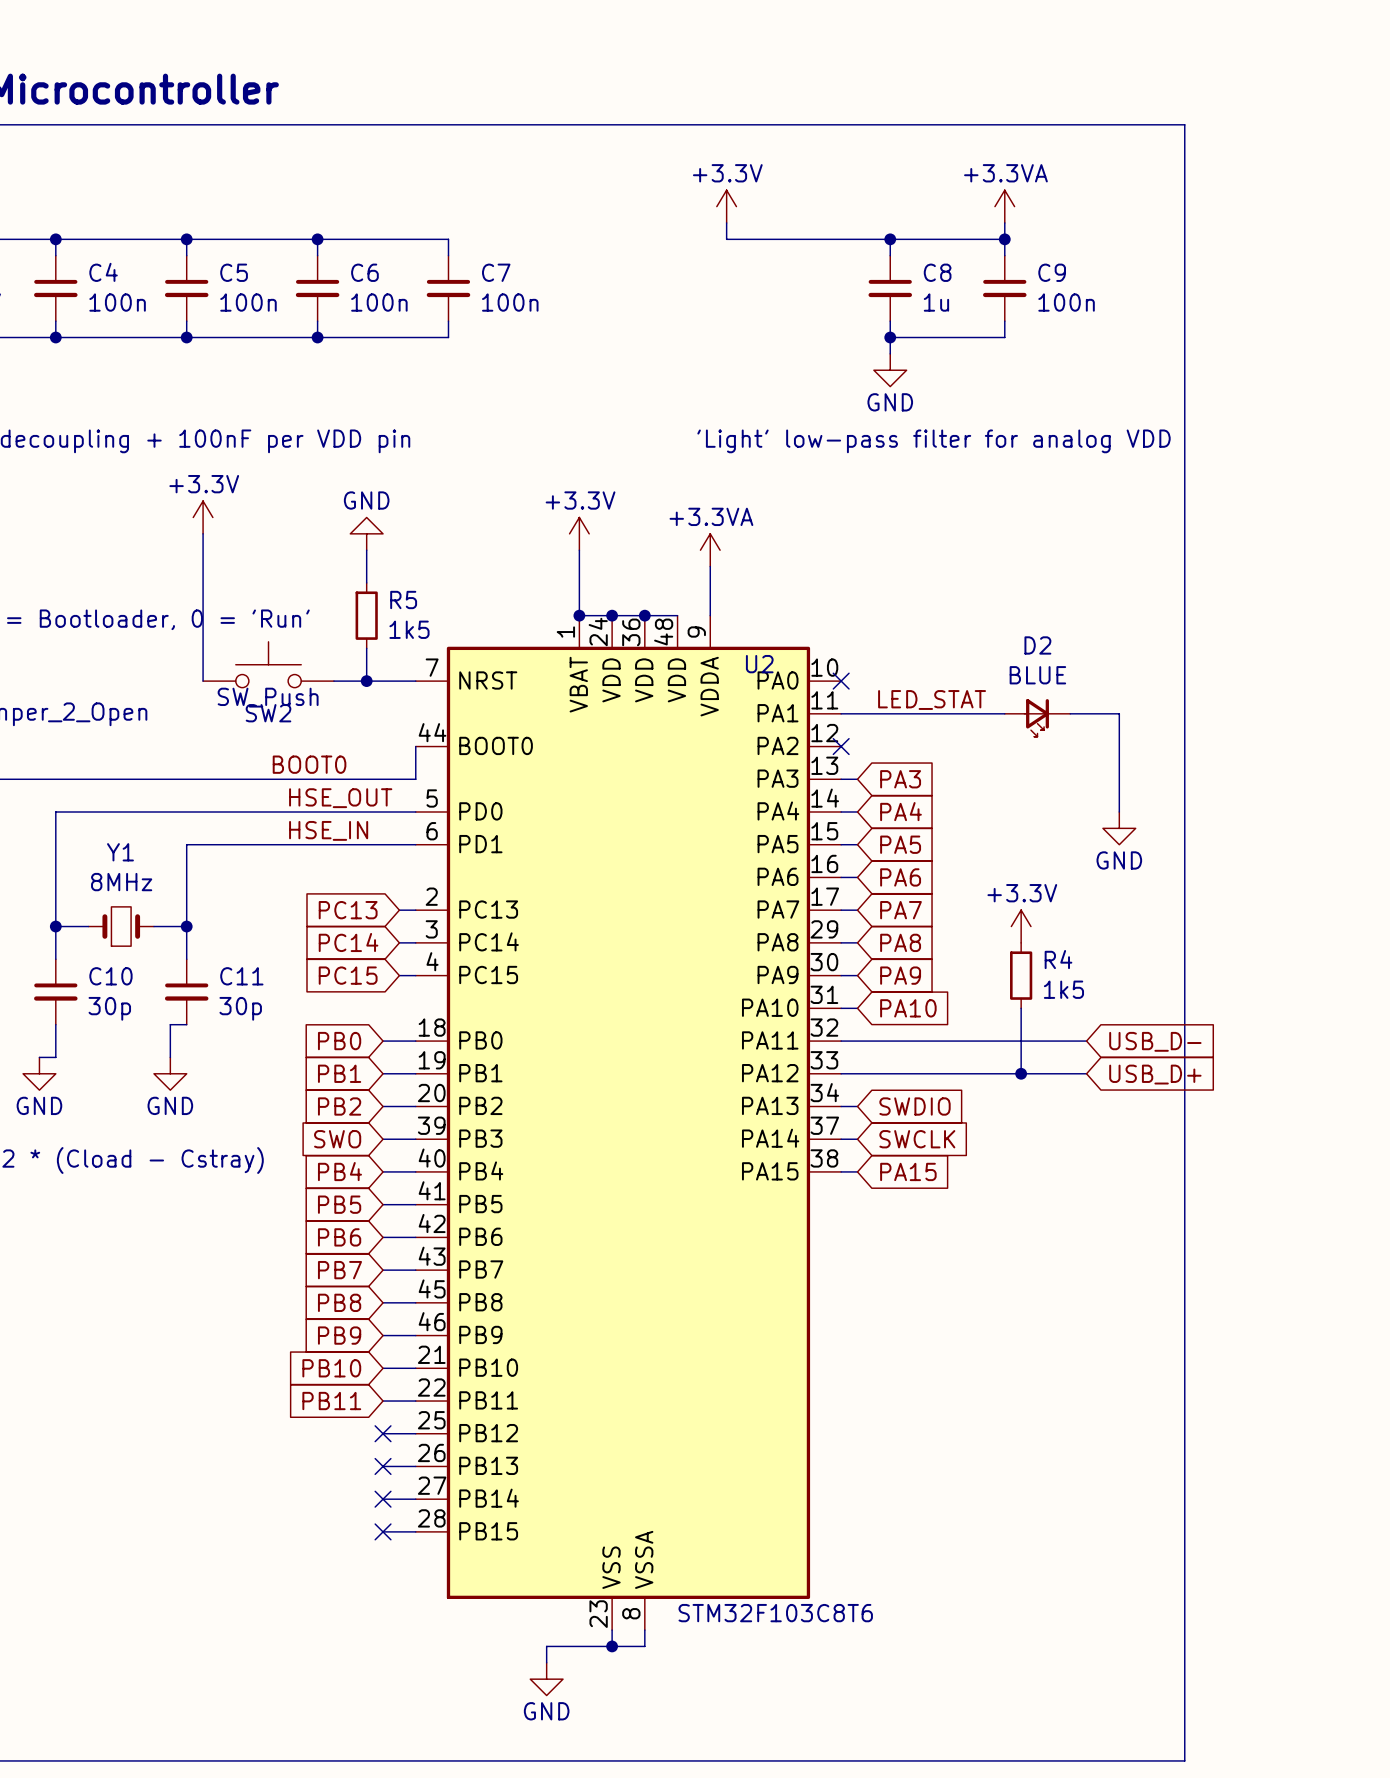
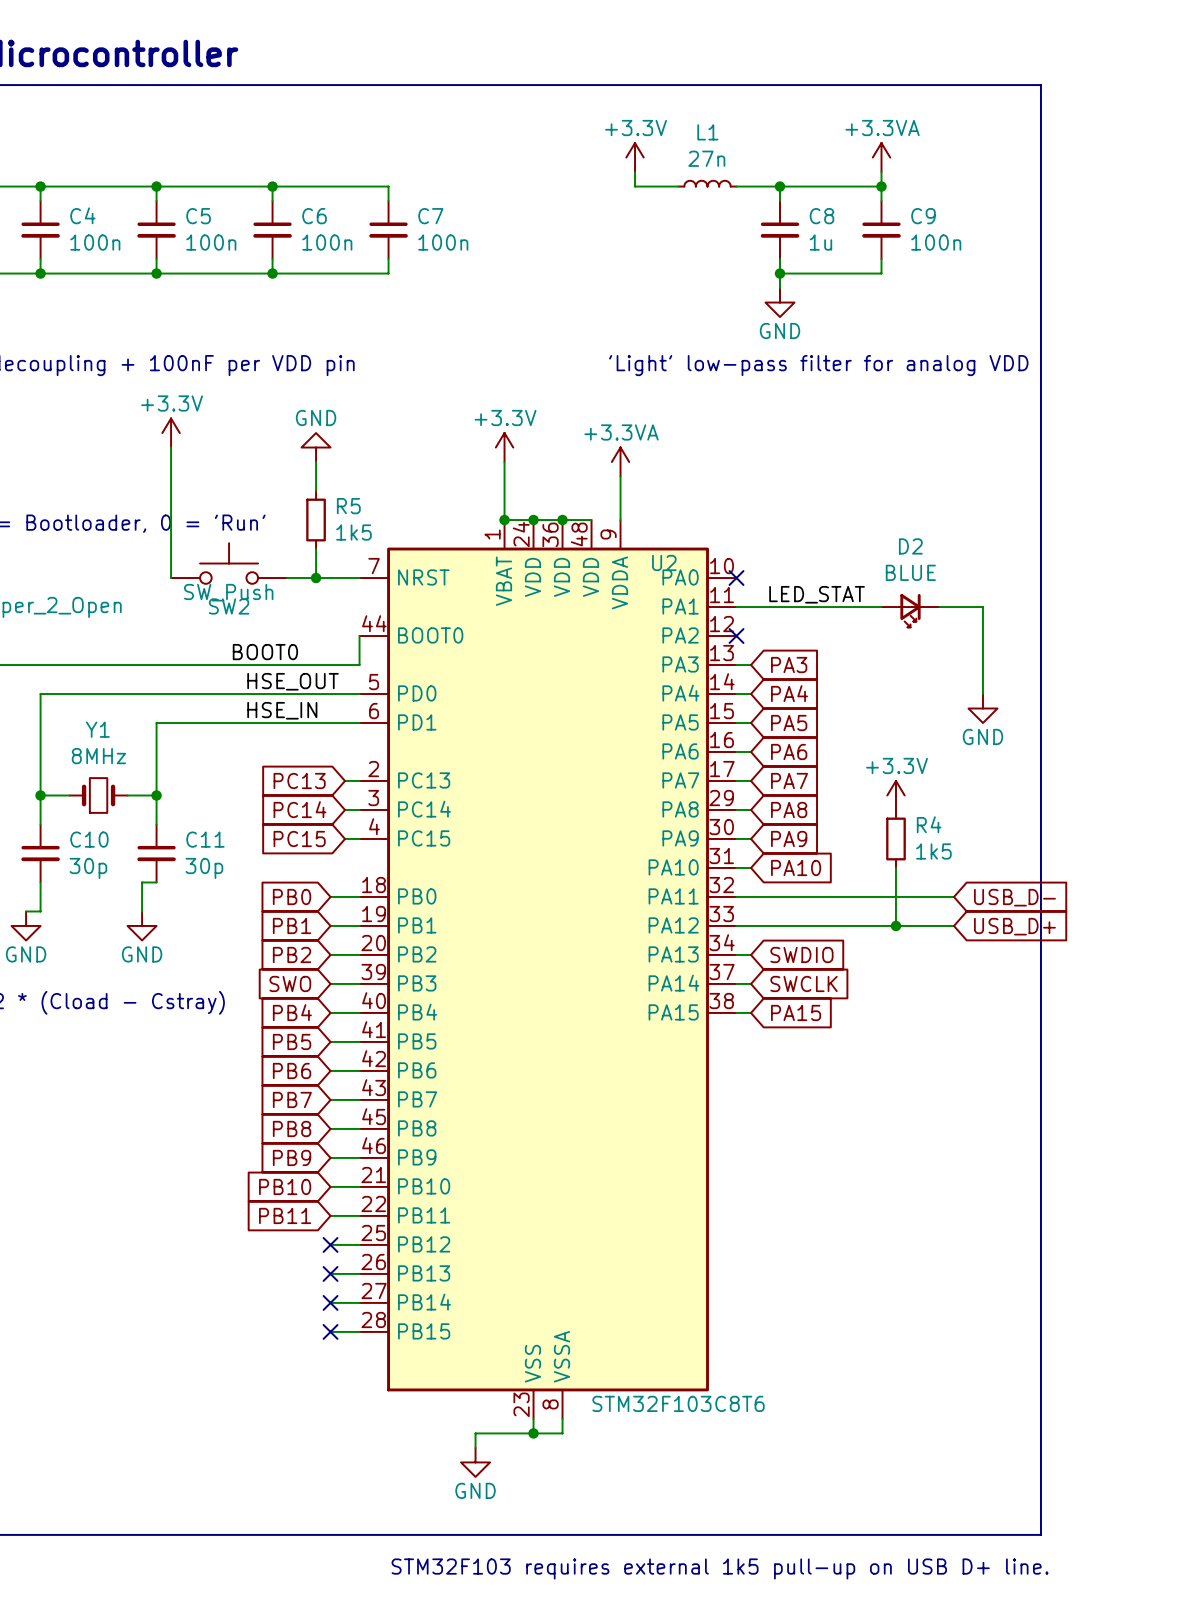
L1: none -> 27n (707, 183)
wire: (775, 239) (841, 239) -> none

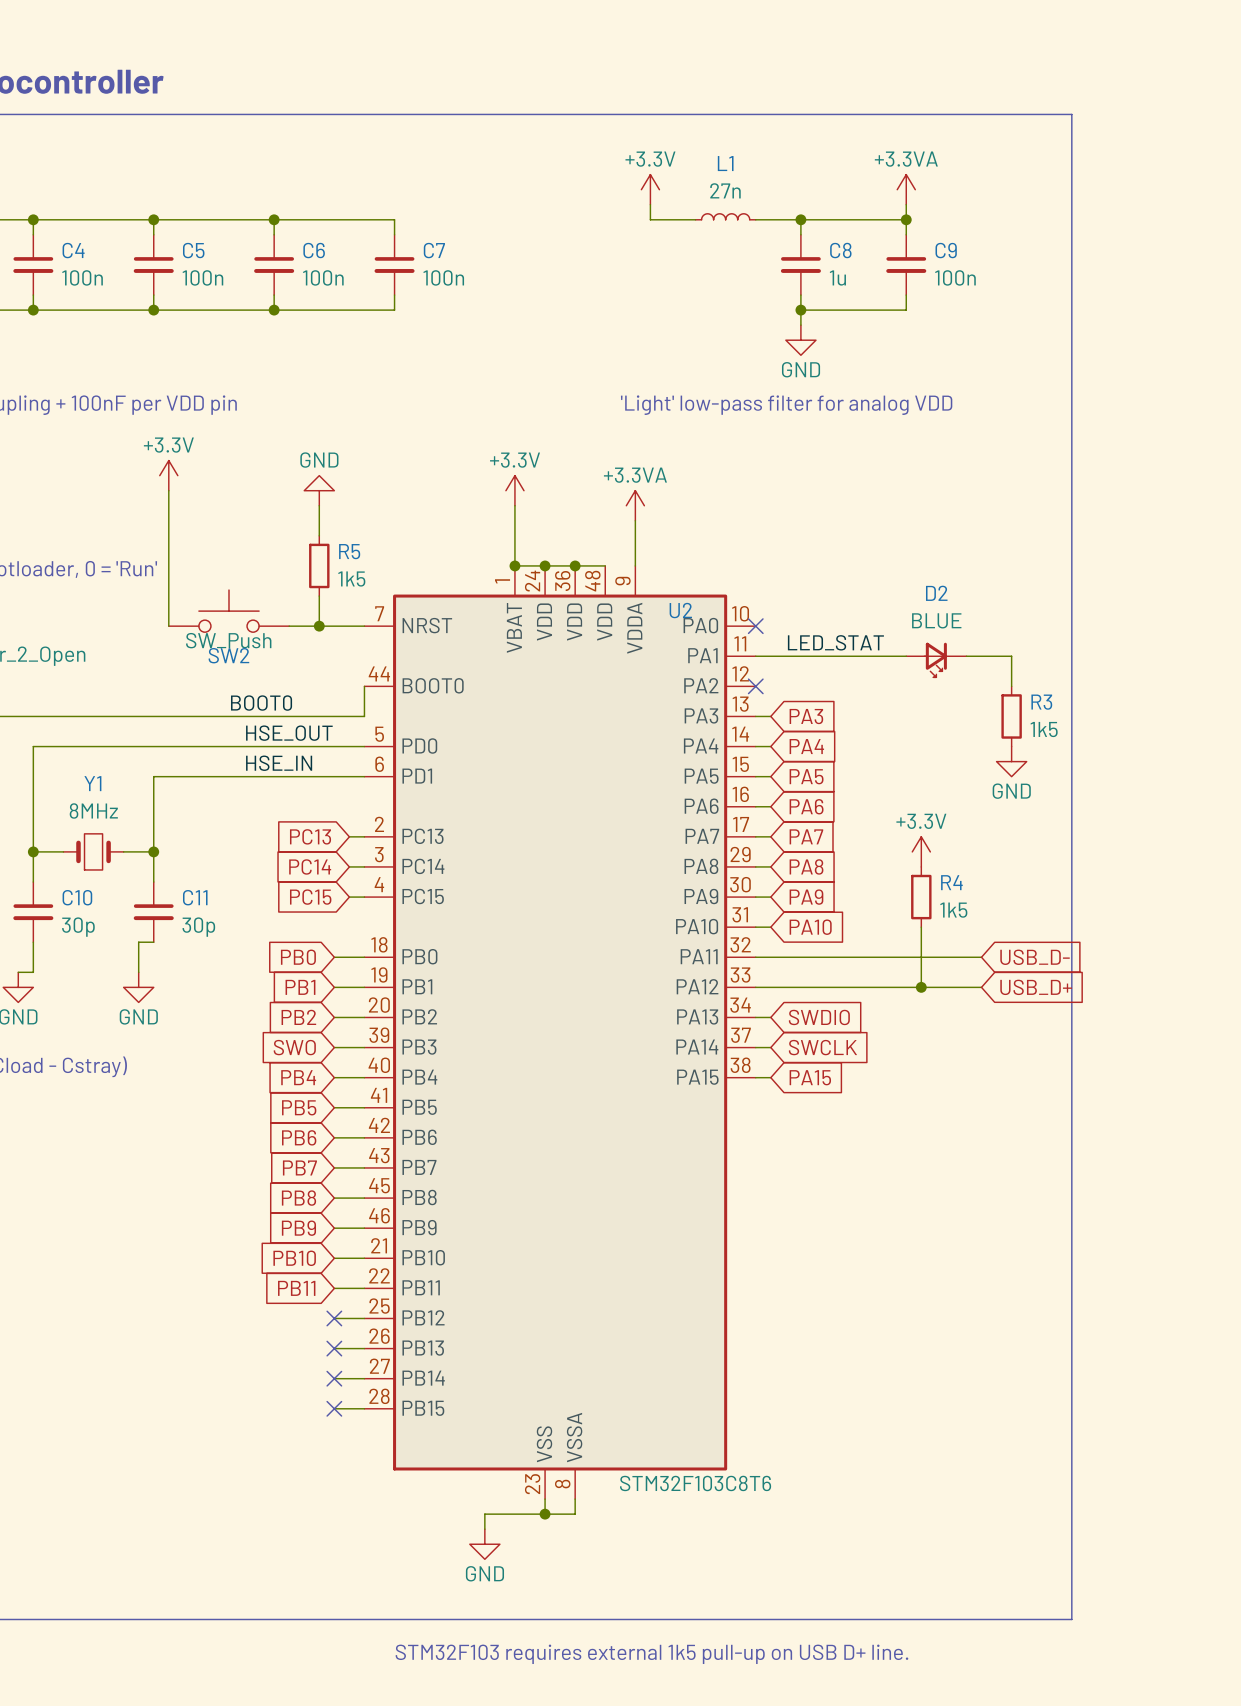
wire: (982, 636) (982, 694) -> none
R3: none -> 1k5 (1011, 716)

